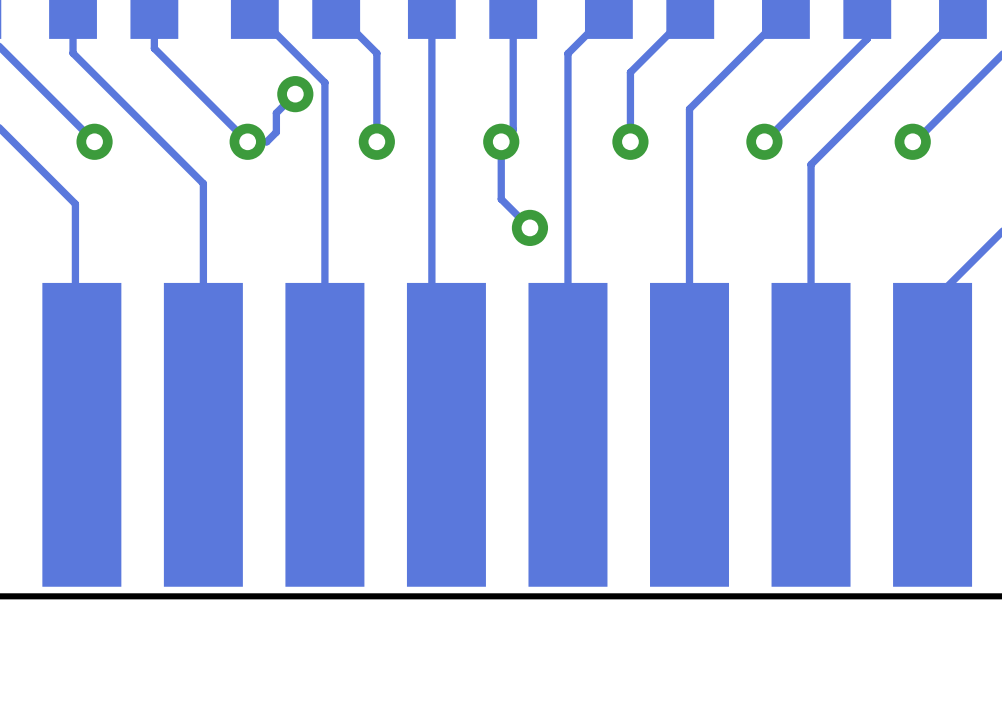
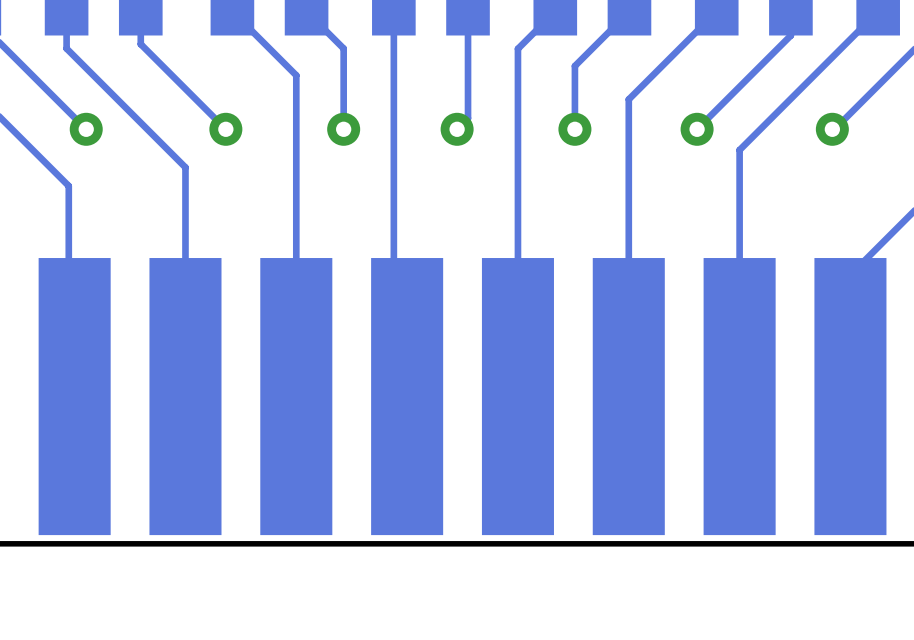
track: (295, 94) (276, 113) (276, 132) (266, 141) (247, 141) -> none
via: (295, 94) -> none
track: (501, 141) (501, 199) (529, 227) -> none
via: (529, 227) -> none

